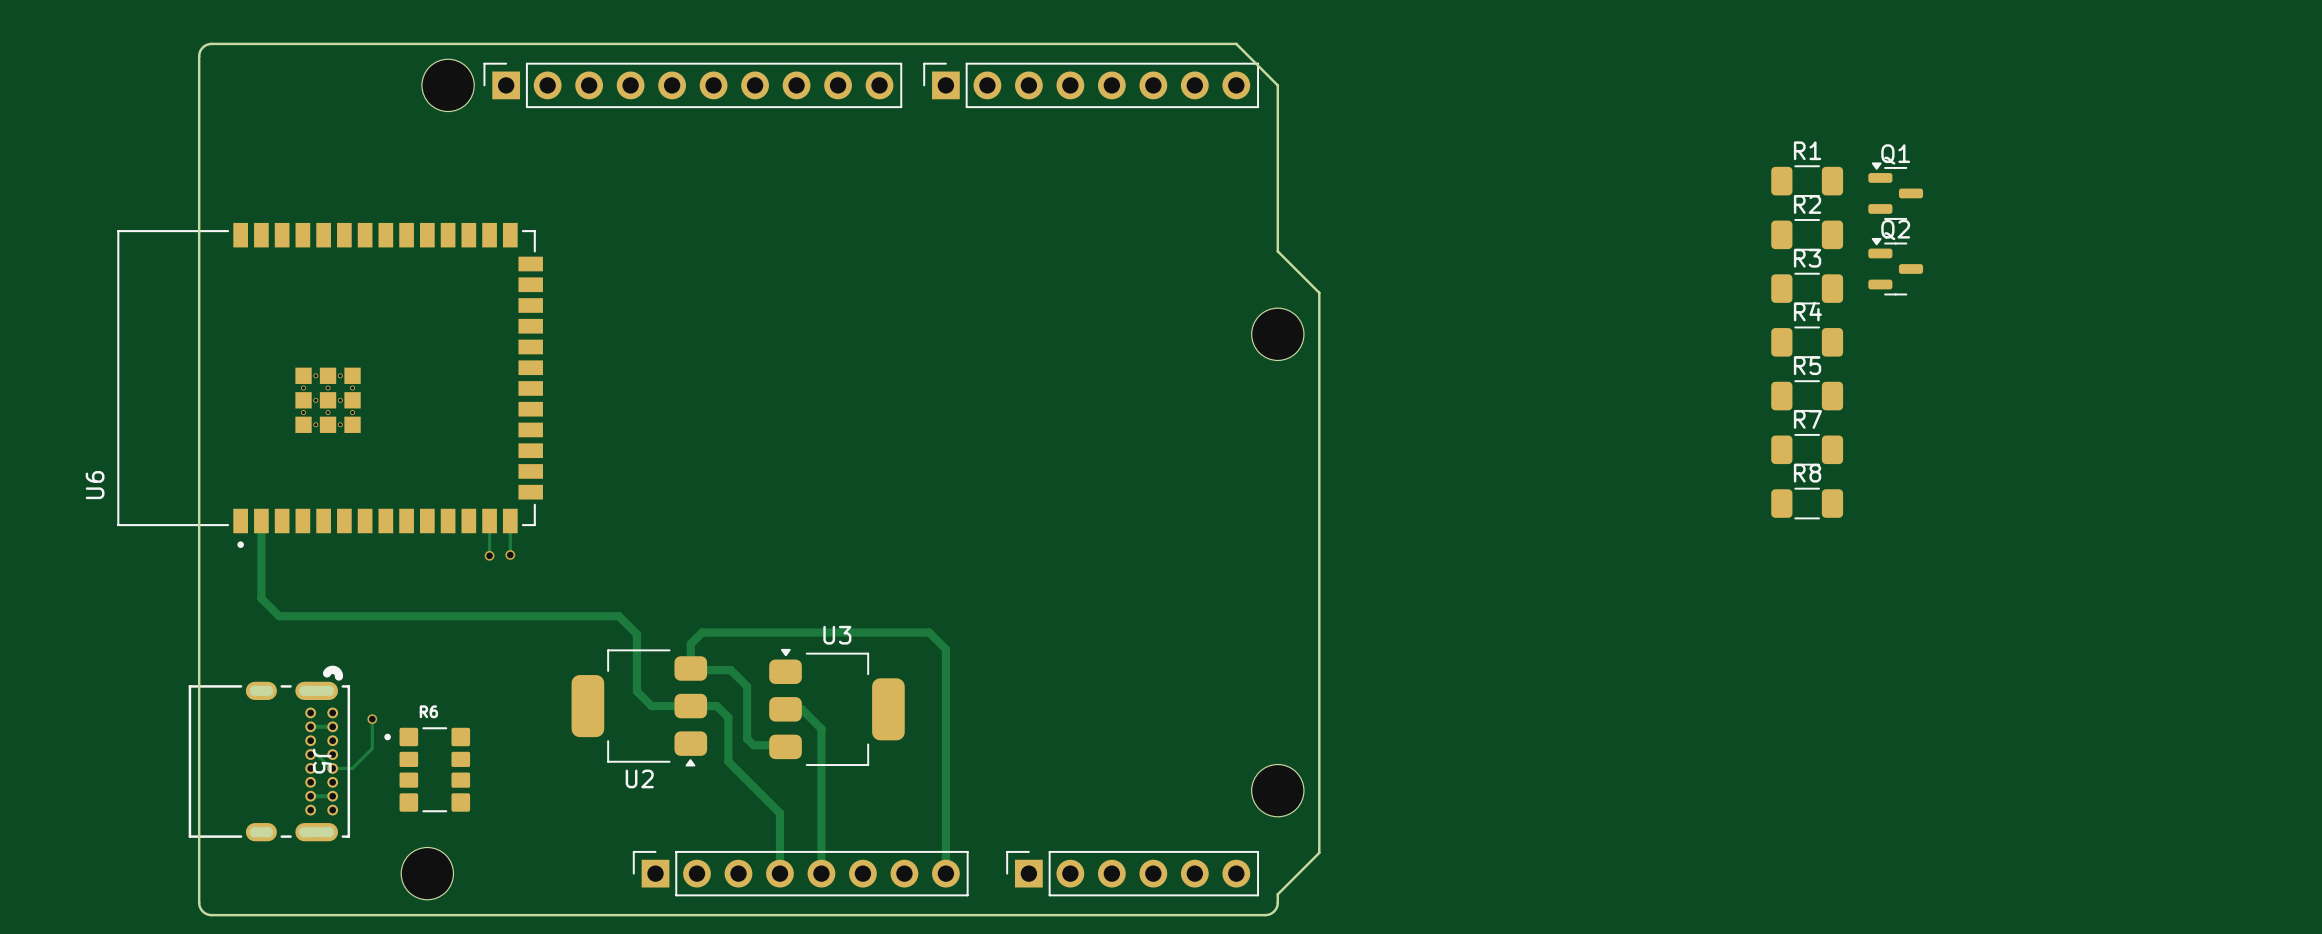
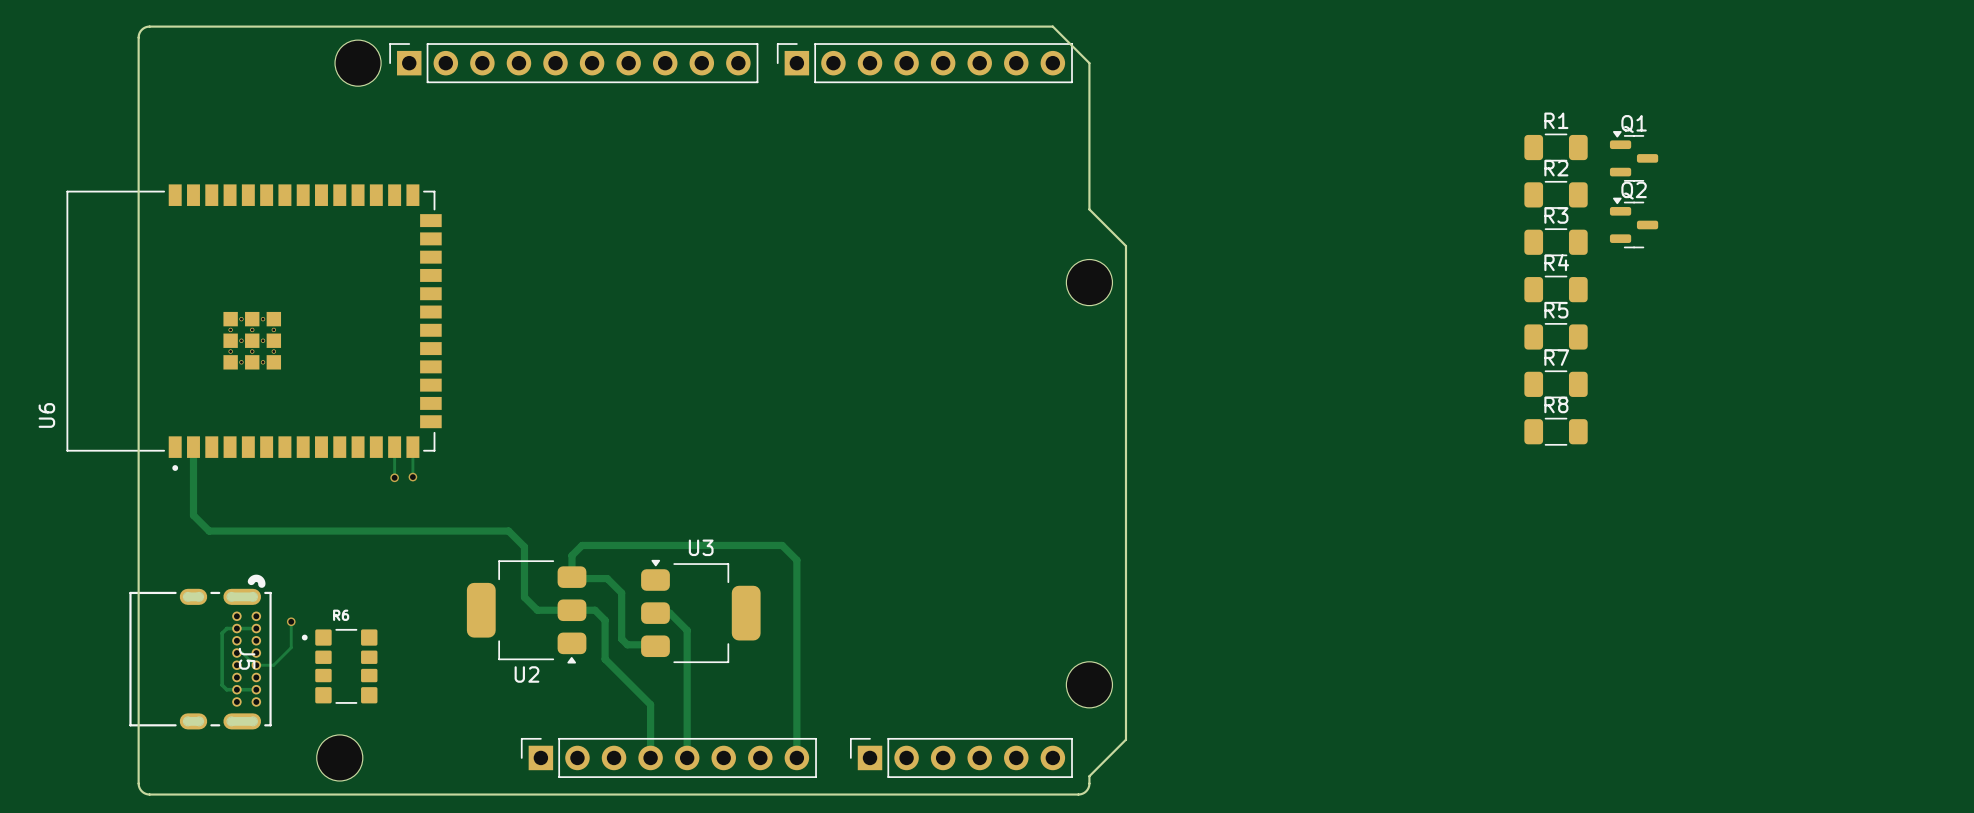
track: none -> (236, 628) (226, 628) (222, 633) (222, 685) (226, 689) (236, 689)

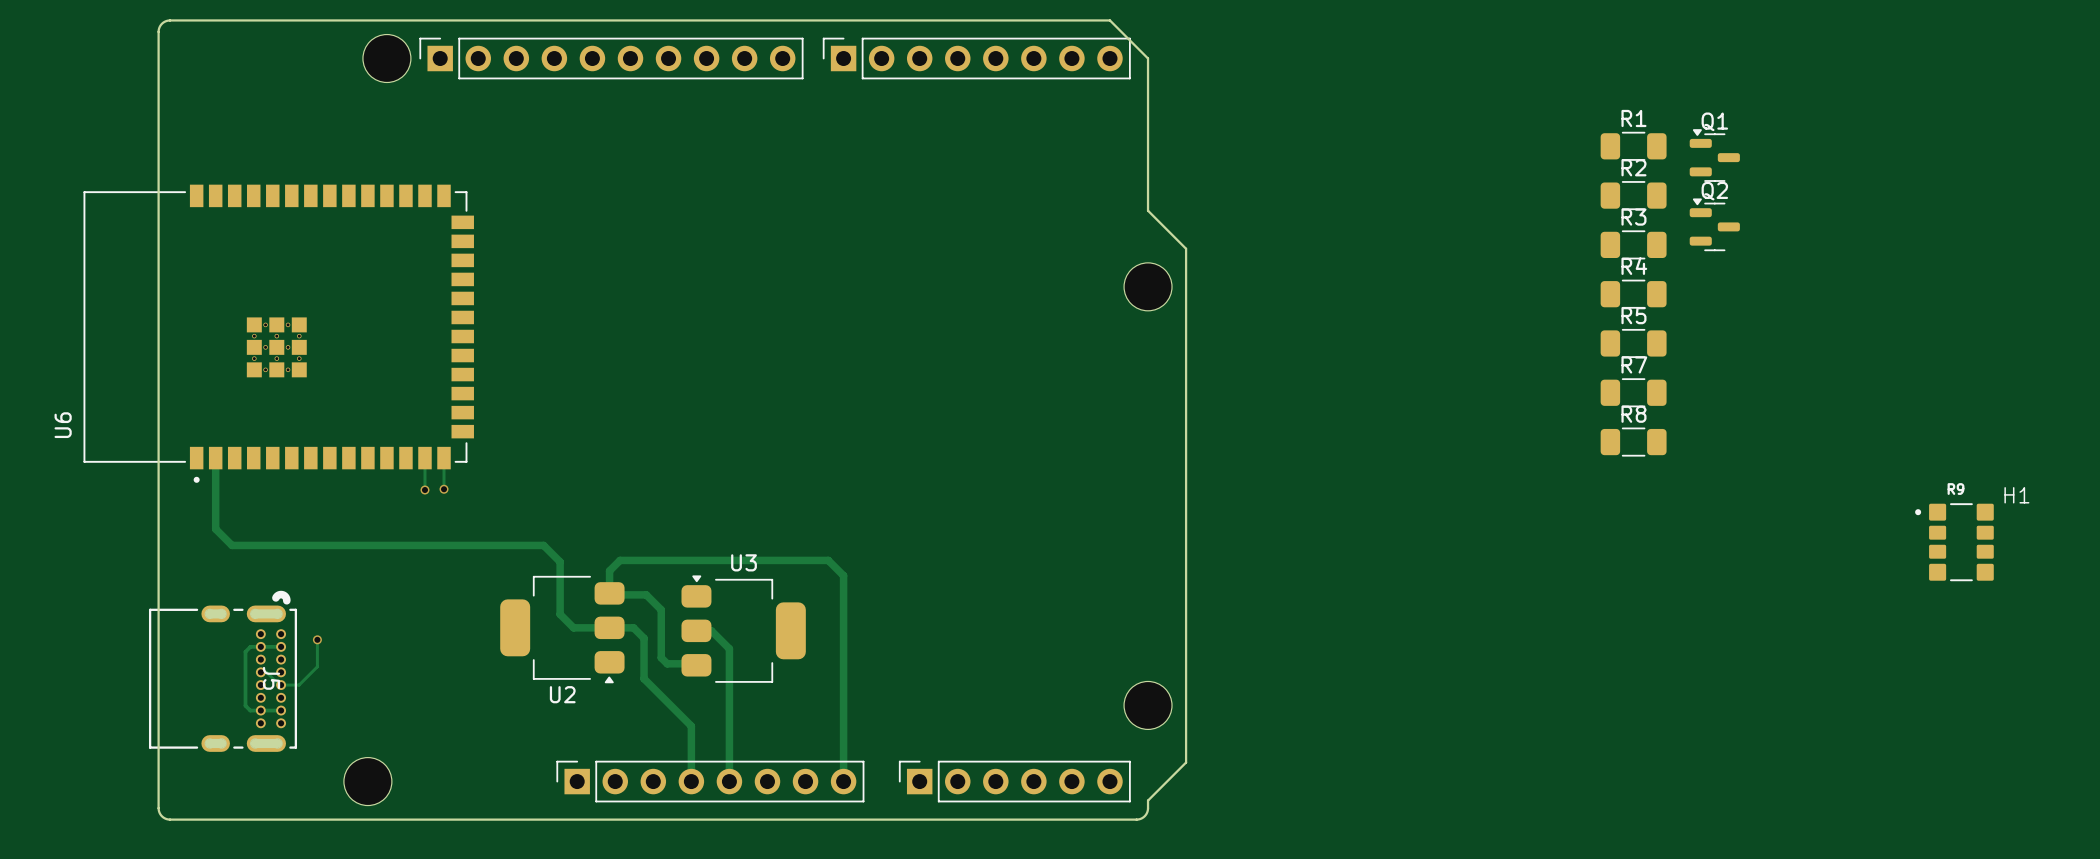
H1: none -> (2016, 495)
R9: none -> (1954, 542)
R6: (339, 666) -> none

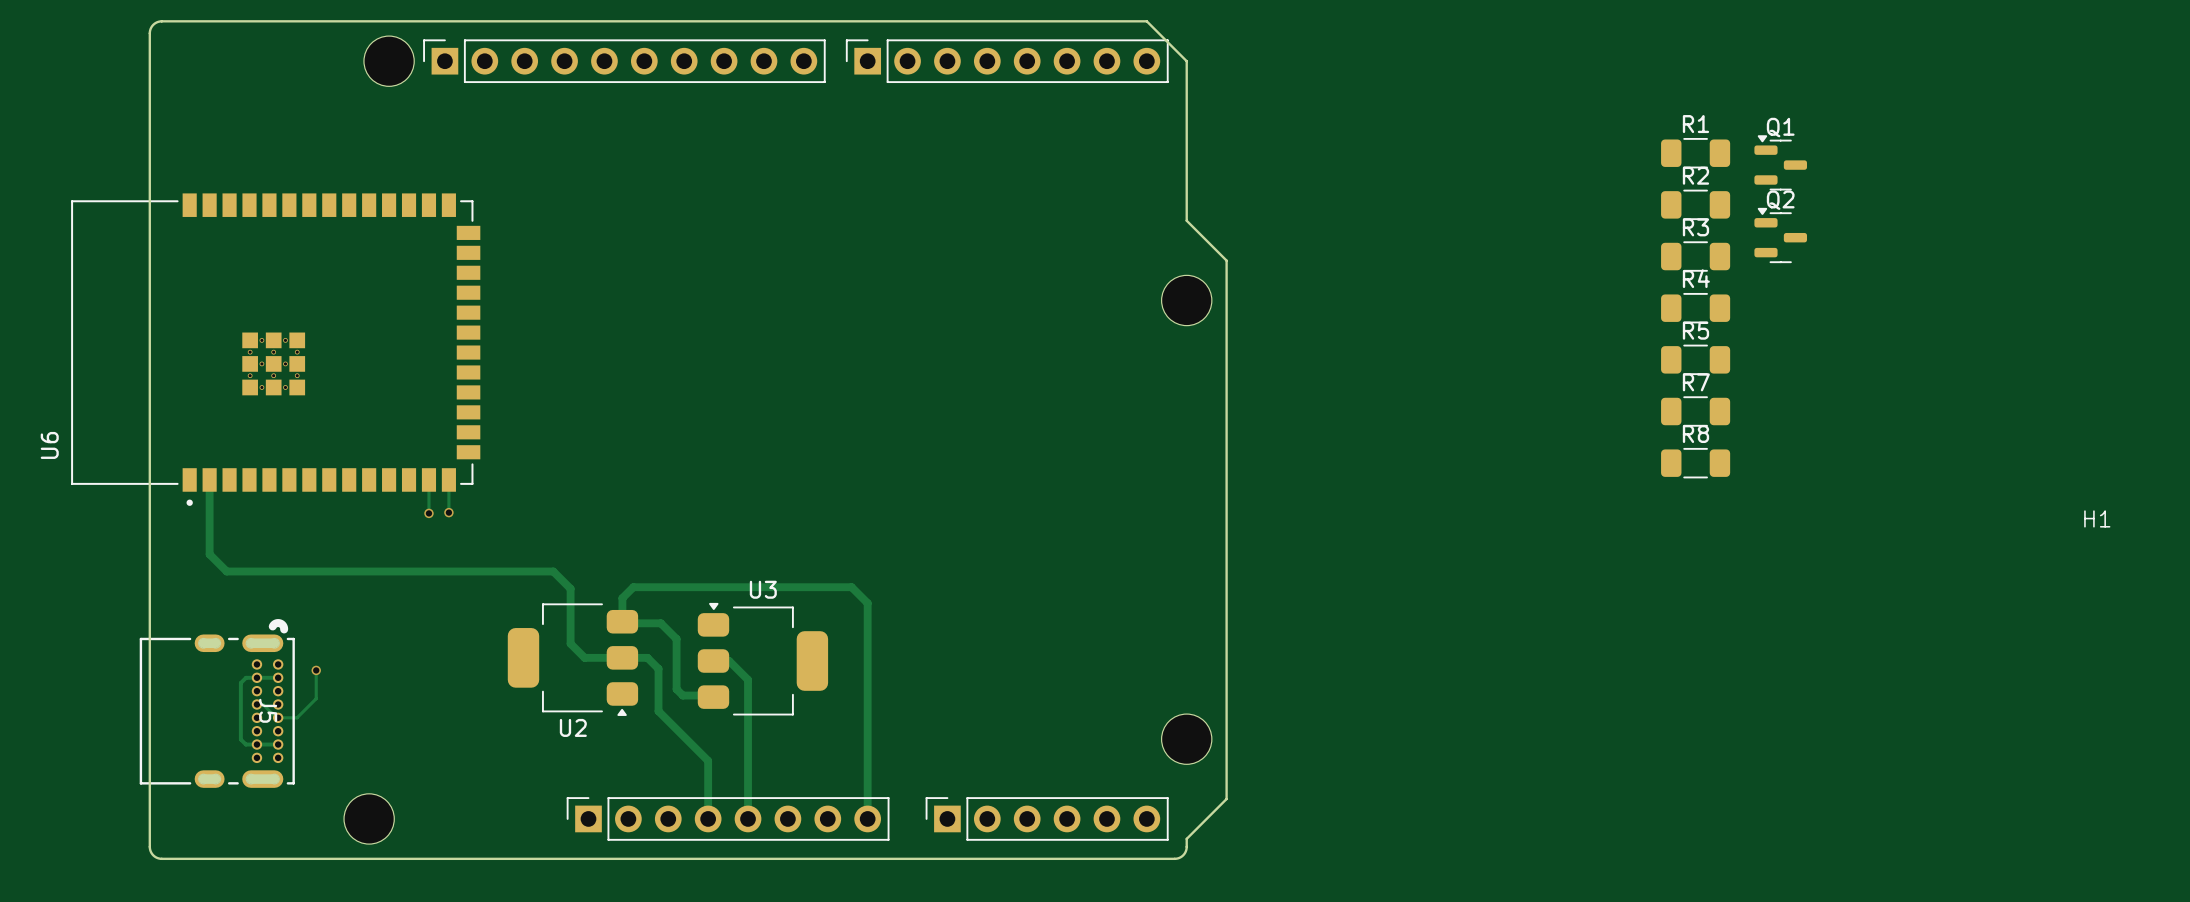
R9: (1954, 542) -> none

